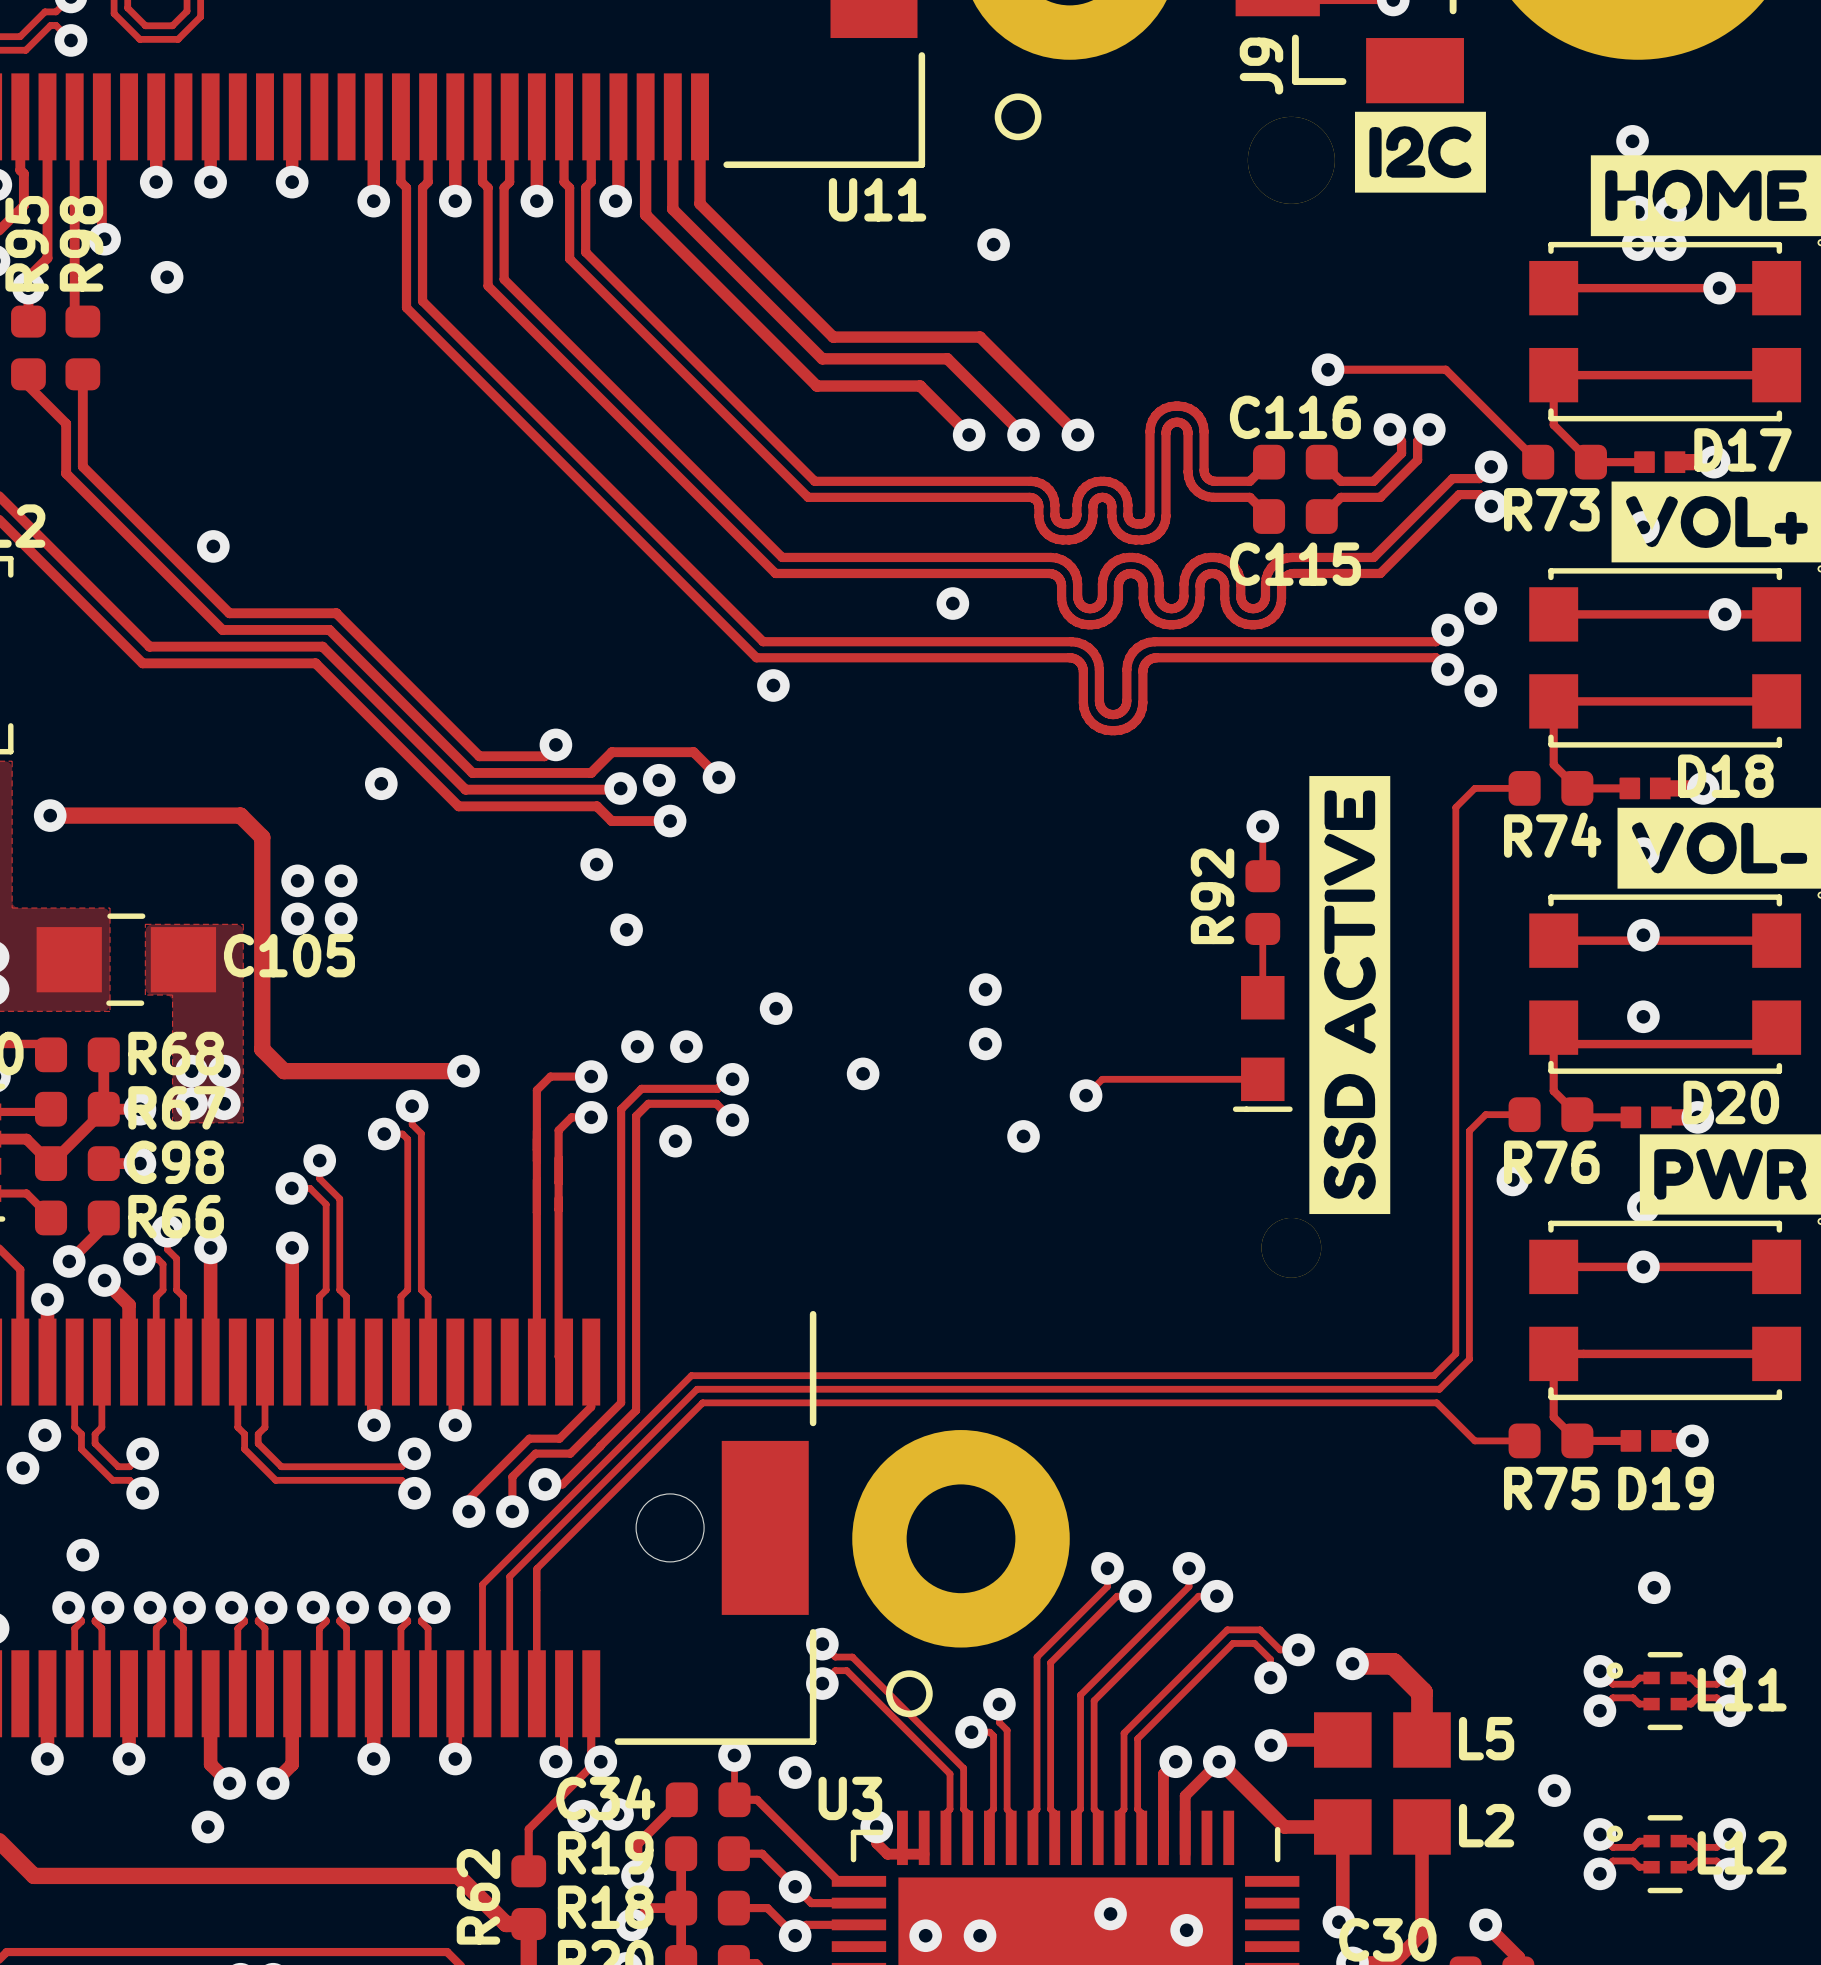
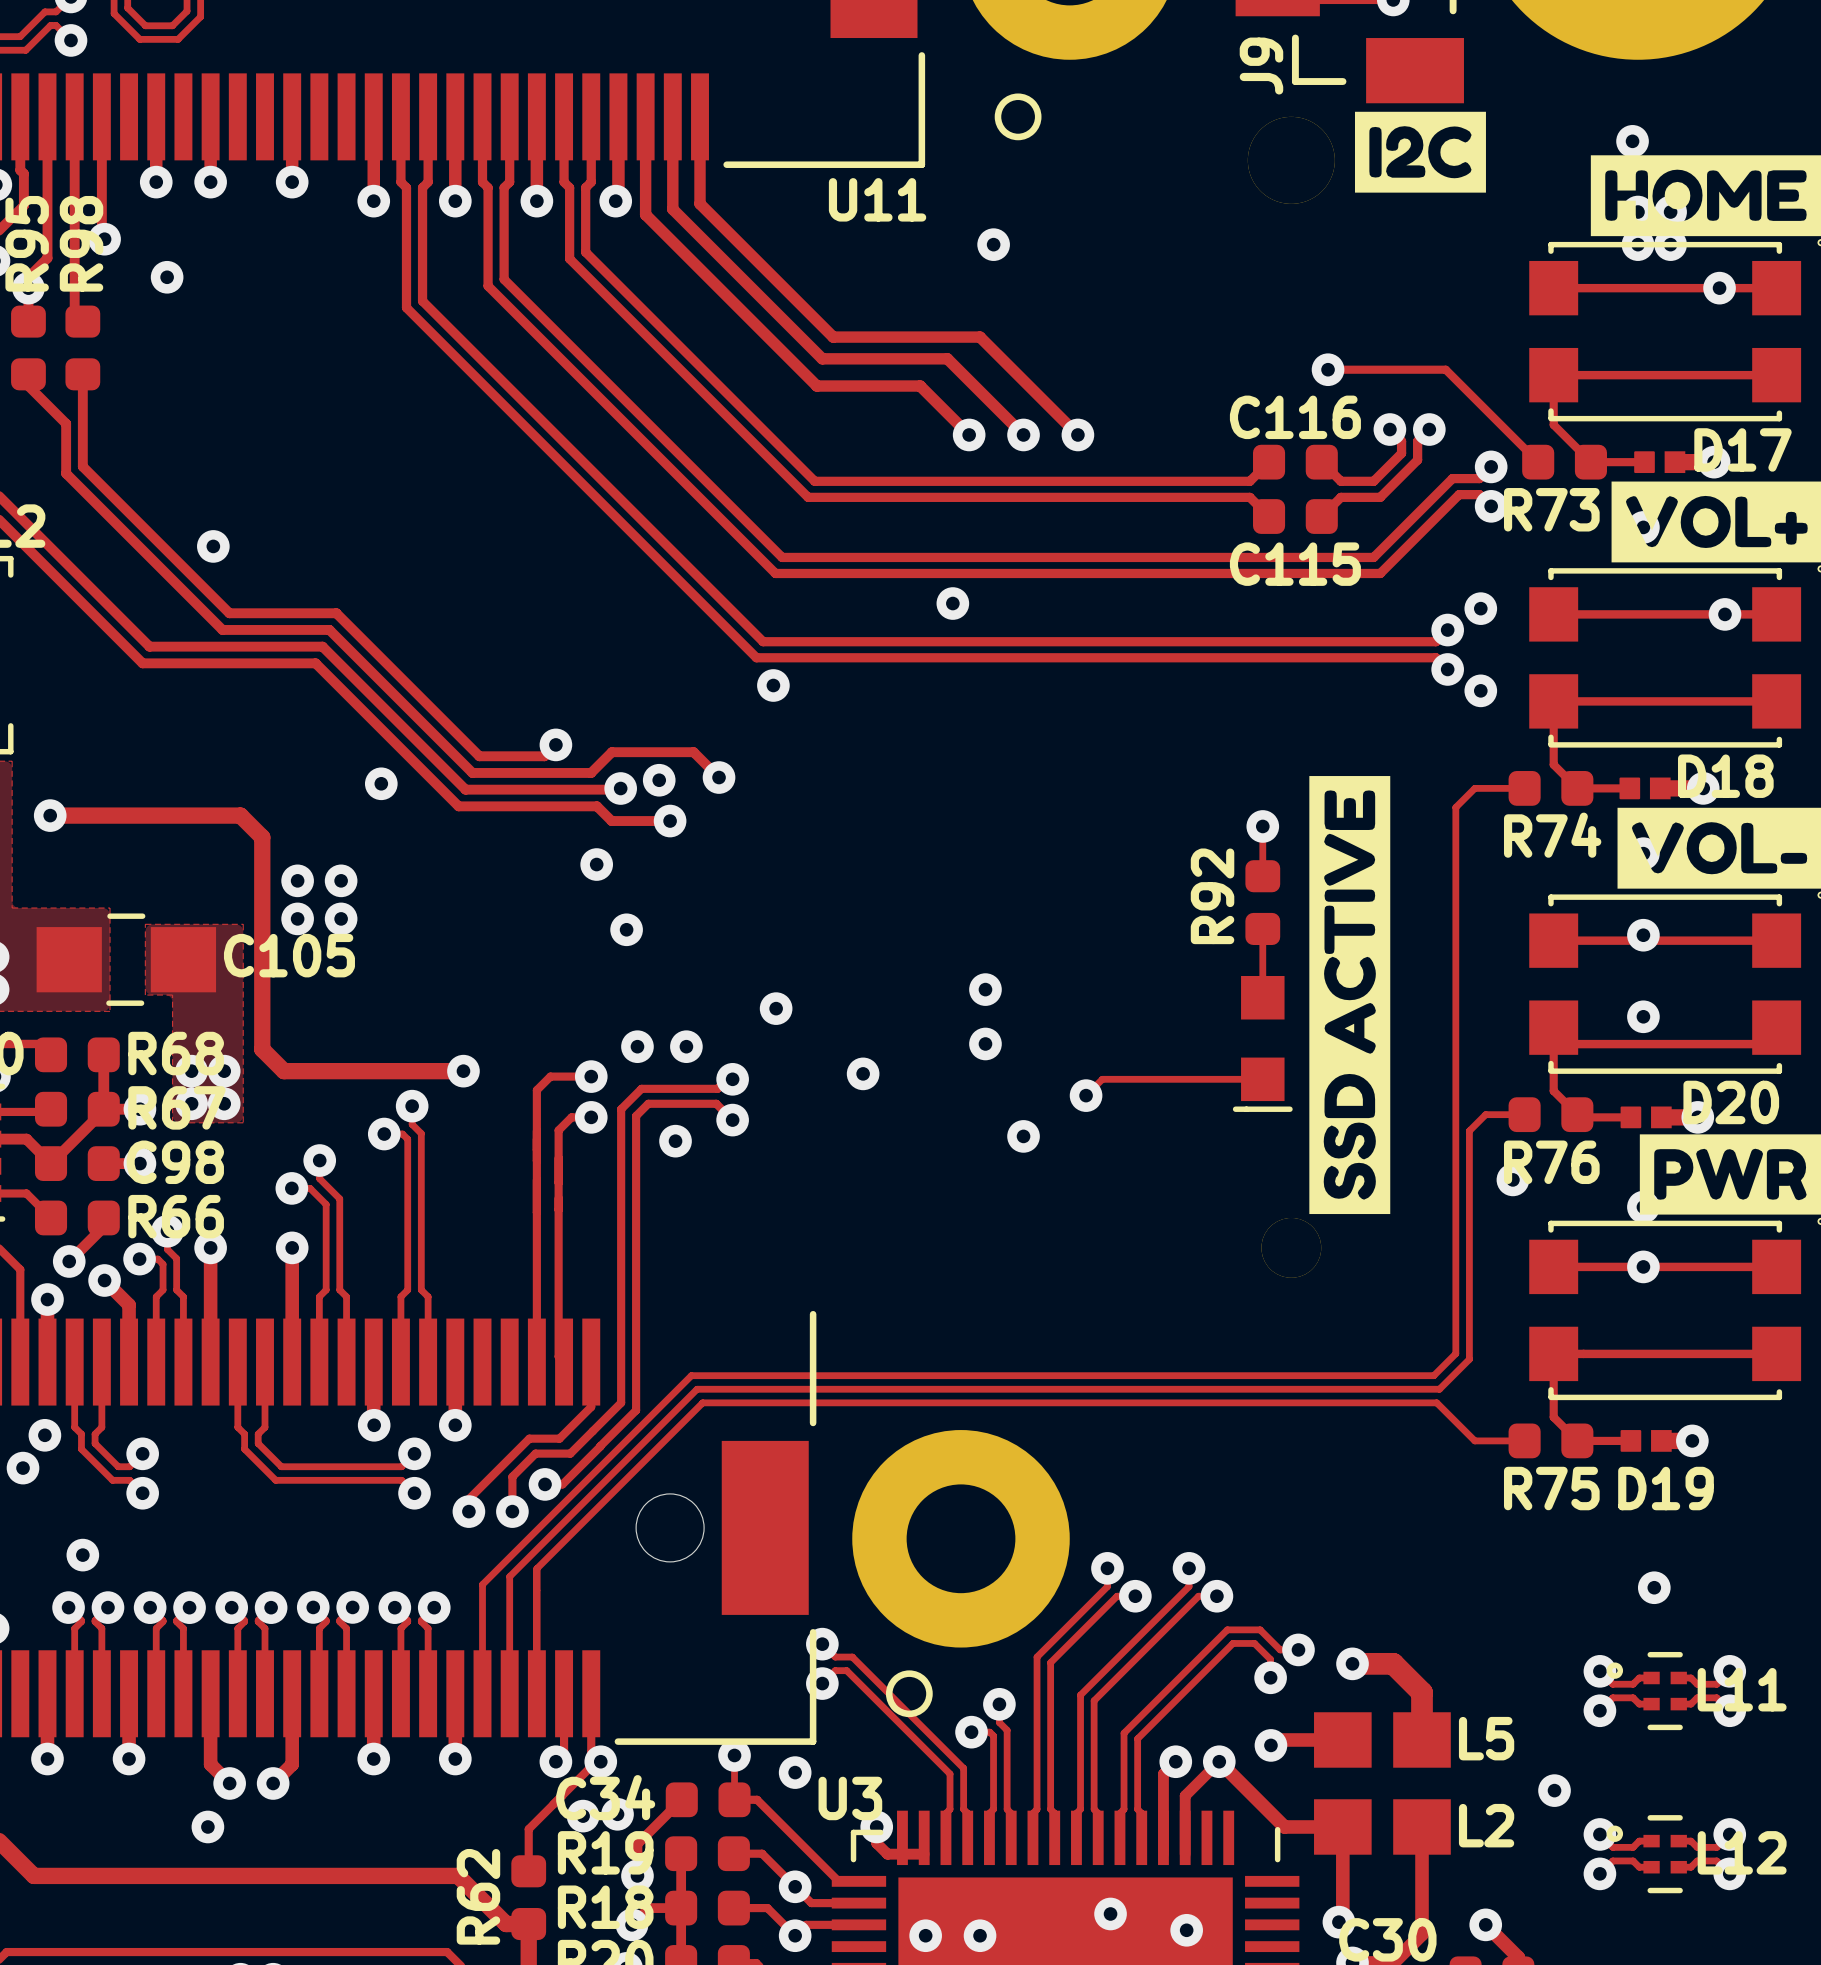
track: (1031, 481) (1041, 483) (1049, 490) (1054, 499) (1055, 518) (1064, 523) (1071, 522) (1076, 518) (1077, 499) (1082, 490) (1090, 483) (1100, 481) -> (1031, 481) (1100, 481)
track: (1104, 481) (1114, 483) (1122, 490) (1127, 499) (1128, 516) (1131, 521) (1140, 523) (1147, 520) (1149, 514) (1150, 425) (1159, 411) (1175, 406) (1189, 408) (1201, 420) (1204, 431) (1204, 472) (1208, 478) (1215, 481) -> (1104, 481) (1215, 481)
track: (1029, 497) (1037, 502) (1039, 521) (1044, 530) (1057, 539) (1074, 539) (1084, 534) (1092, 521) (1093, 502) (1102, 497) (1110, 502) (1112, 521) (1120, 534) (1135, 539) (1152, 537) (1160, 530) (1165, 521) (1166, 430) (1170, 424) (1177, 422) (1183, 424) (1187, 430) (1188, 471) (1190, 482) (1202, 494) (1213, 497) -> (1029, 497) (1213, 497)
track: (1050, 557) (1062, 560) (1071, 567) (1076, 578) (1078, 601) (1084, 607) (1090, 608) (1095, 607) (1101, 601) (1103, 578) (1108, 567) (1117, 560) (1129, 557) -> (1050, 557) (1129, 557)
track: (1132, 557) (1144, 560) (1153, 567) (1158, 578) (1160, 601) (1166, 607) (1171, 608) (1176, 607) (1182, 601) (1184, 578) (1189, 567) (1199, 560) (1210, 557) -> (1132, 557) (1210, 557)
track: (1214, 557) (1225, 560) (1234, 567) (1240, 578) (1241, 601) (1247, 607) (1253, 608) (1258, 607) (1264, 601) (1266, 578) (1271, 567) (1280, 560) (1292, 557) -> (1214, 557) (1292, 557)
track: (1049, 573) (1054, 574) (1060, 580) (1062, 603) (1067, 614) (1076, 622) (1088, 624) (1103, 622) (1112, 614) (1117, 603) (1119, 580) (1125, 574) (1130, 573) (1136, 574) (1141, 580) (1145, 609) (1158, 622) (1173, 624) (1189, 618) (1199, 603) (1201, 580) (1206, 574) (1212, 573) (1217, 574) (1223, 580) (1225, 603) (1230, 614) (1245, 624) (1260, 624) (1275, 614) (1280, 603) (1282, 580) (1288, 574) (1293, 573) -> (1049, 573) (1293, 573)
track: (1071, 641) (1083, 644) (1096, 657) (1099, 669) (1099, 703) (1104, 711) (1113, 714) (1121, 711) (1126, 703) (1126, 669) (1129, 657) (1142, 644) (1154, 641) -> (1071, 641) (1154, 641)
track: (1069, 657) (1078, 660) (1083, 668) (1083, 702) (1086, 714) (1099, 727) (1111, 730) (1127, 727) (1140, 714) (1142, 702) (1143, 668) (1148, 660) (1156, 657) -> (1069, 657) (1156, 657)

